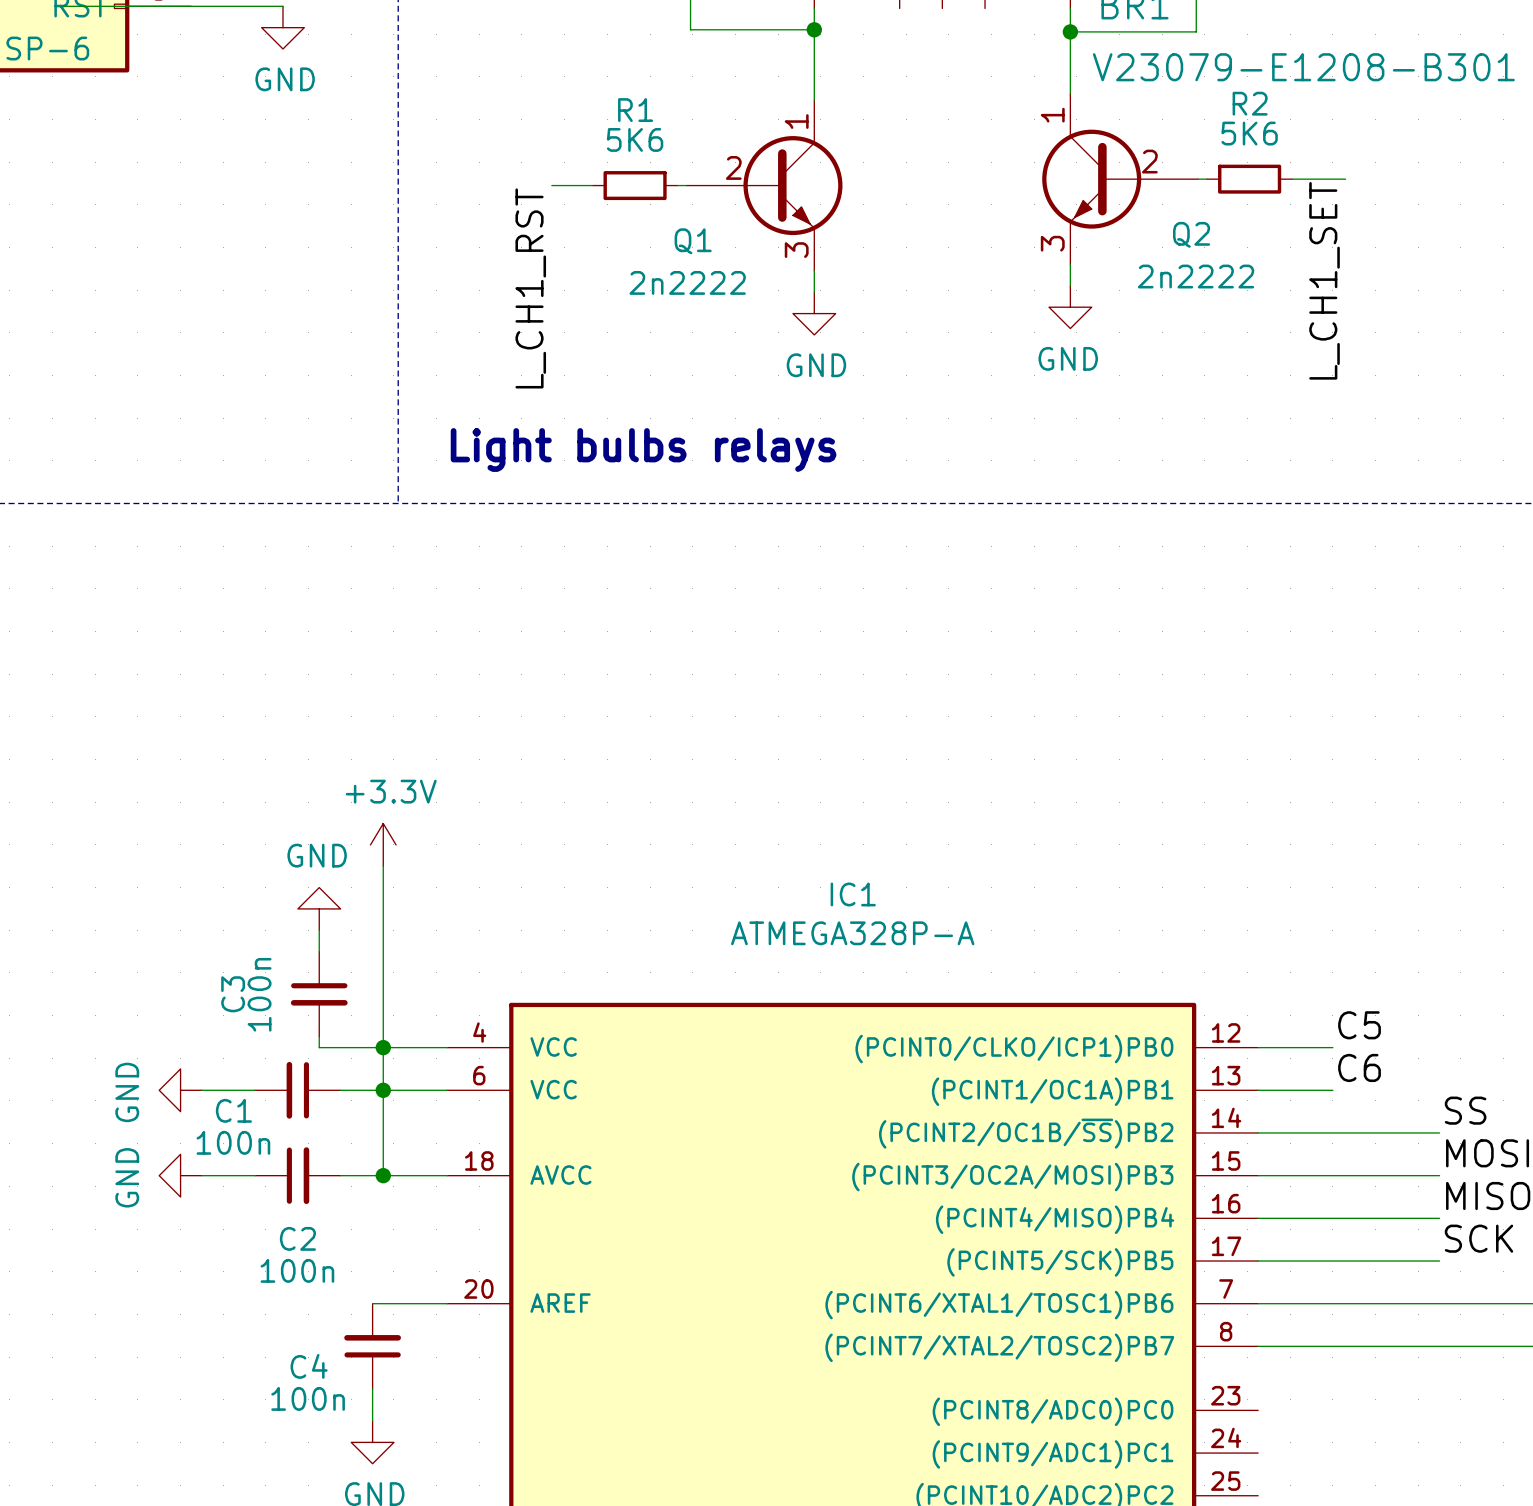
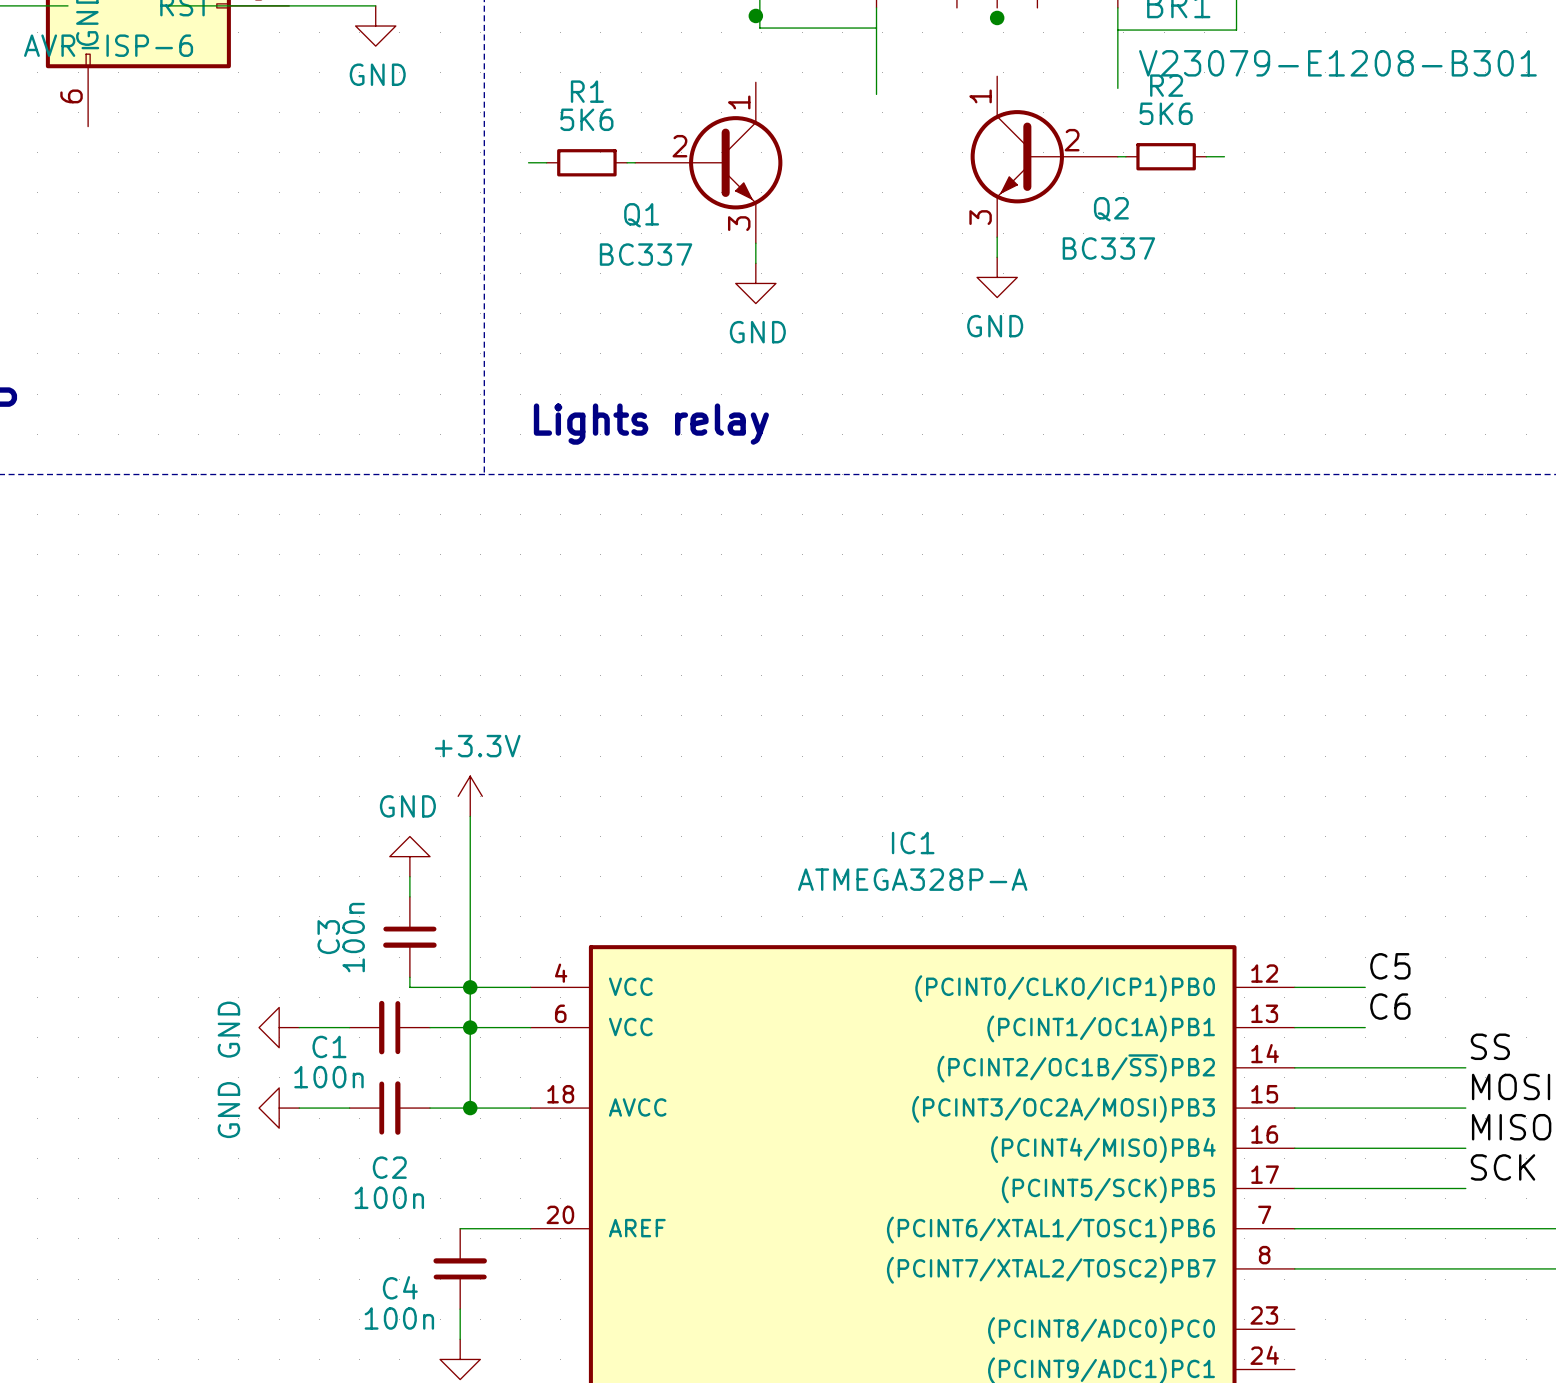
junction: none -> (755, 15)
junction: none -> (997, 17)
junction: (814, 29) -> none
junction: (1070, 31) -> none
wire: none -> (1206, 156) (1224, 156)
wire: none -> (528, 162) (546, 162)
Q2 position: (1120, 179) -> (1044, 156)
wire: (1198, 179) (1206, 179) -> (1117, 156) (1125, 156)
R2 position: (1249, 179) -> (1166, 156)
wire: (1292, 179) (1345, 179) -> none
wire: (551, 185) (592, 185) -> none
R1 position: (635, 185) -> (586, 162)
wire: (677, 185) (686, 185) -> (627, 162) (635, 162)
Q1 position: (764, 185) -> (708, 162)
wire: (1070, 264) (1070, 285) -> (997, 237) (997, 257)
wire: (814, 270) (814, 292) -> (755, 243) (755, 263)
Q2 value: 2n2222 (1196, 276) -> BC337 (1108, 248)
label: L_CH1_SET (1324, 280) -> none
Q1 value: 2n2222 (687, 282) -> BC337 (646, 254)
label: L_CH1_RST (530, 288) -> none
power symbol: none -> GND (997, 277)
power symbol: none -> GND (755, 283)
power symbol: GND (1070, 307) -> none
power symbol: GND (814, 313) -> none
text: Light bulbs relays (643, 449) -> Lights relay (651, 424)

